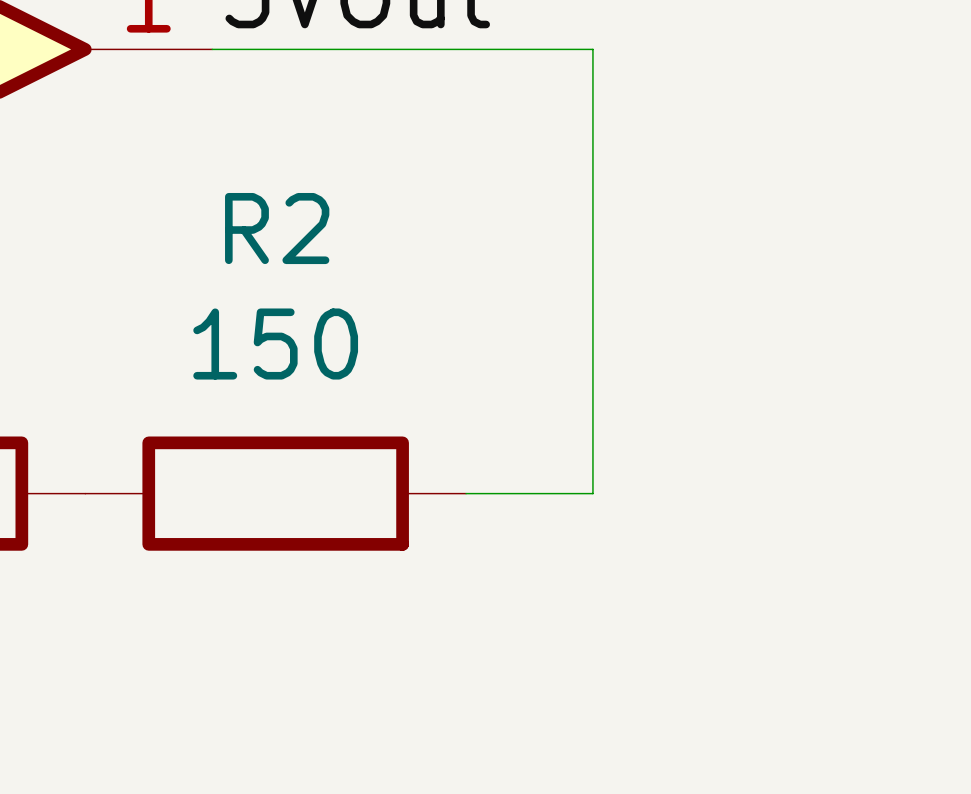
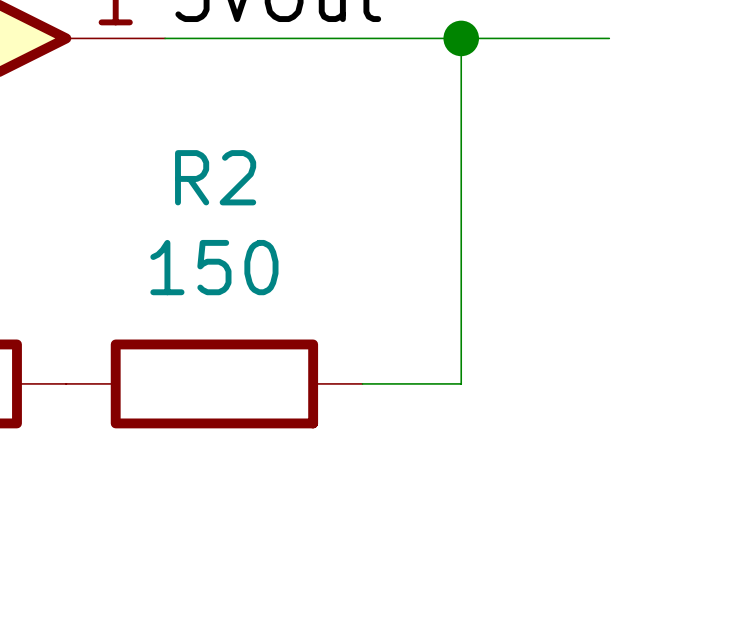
wire: none -> (461, 38) (609, 38)
junction: none -> (461, 38)

